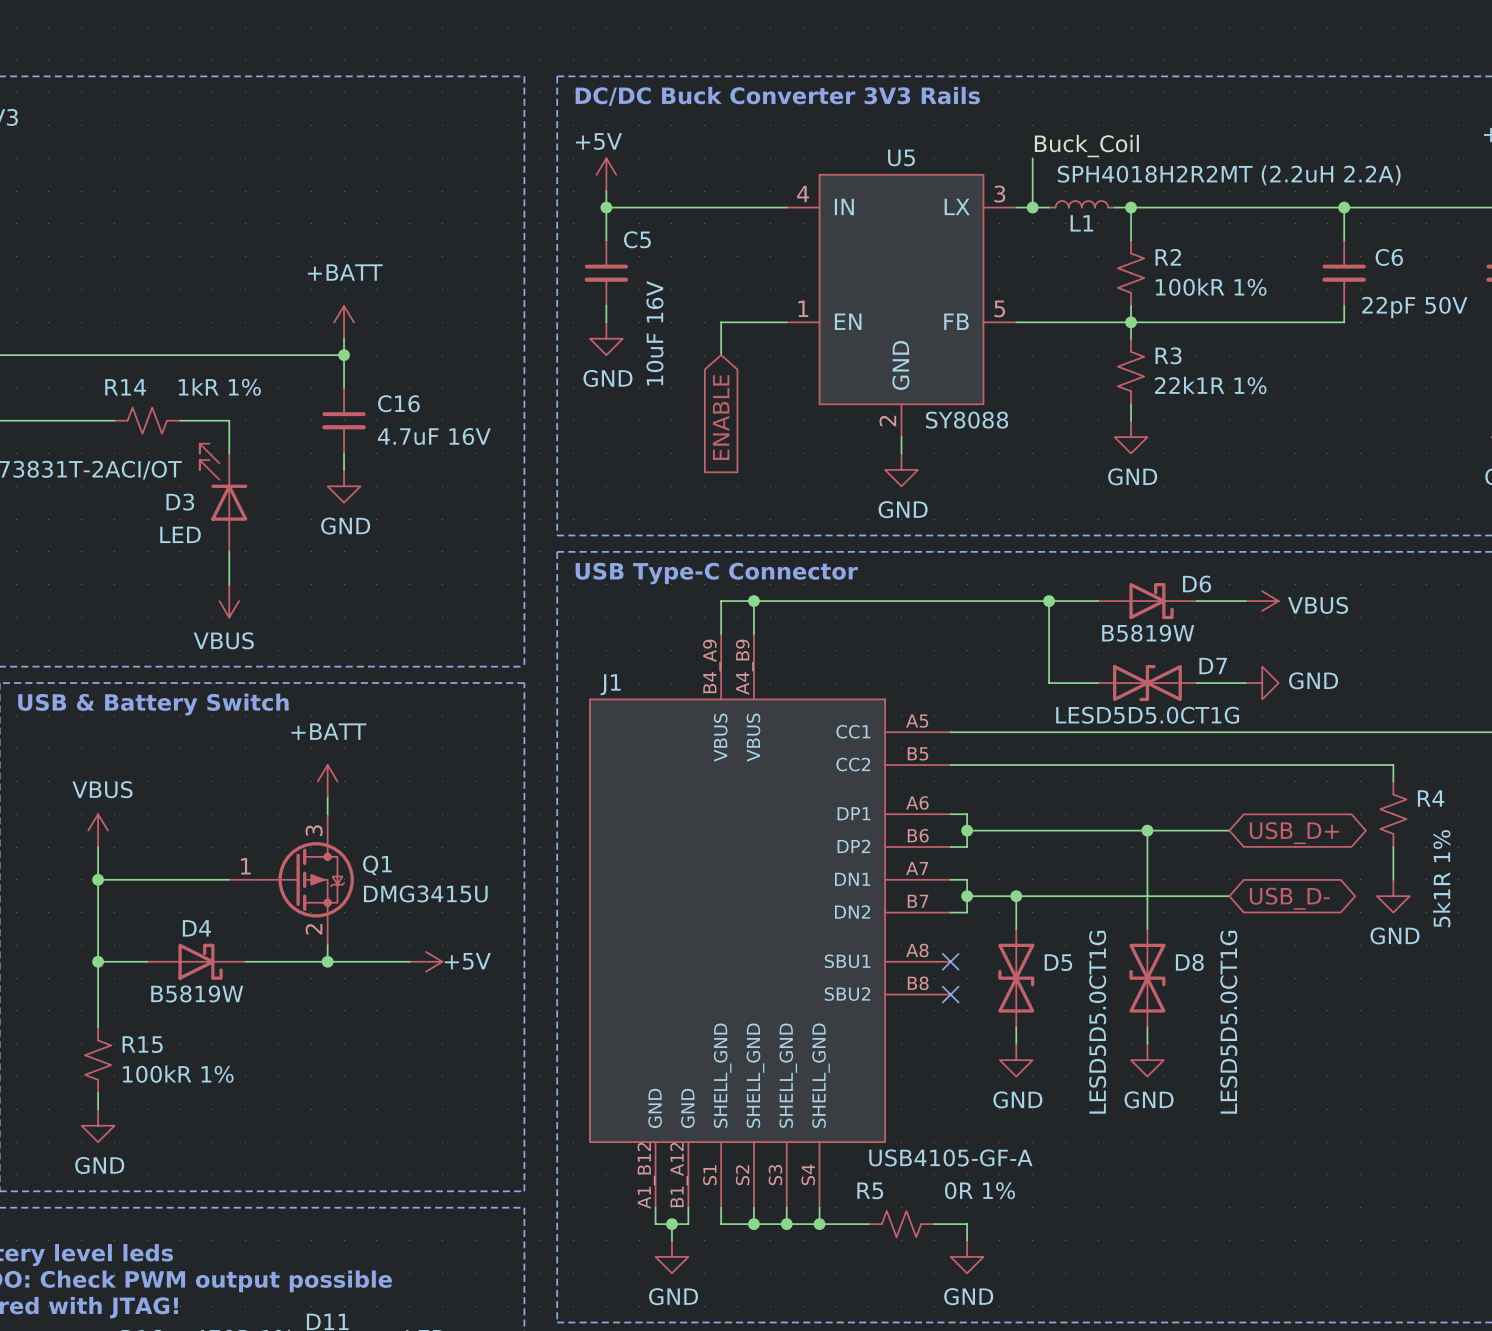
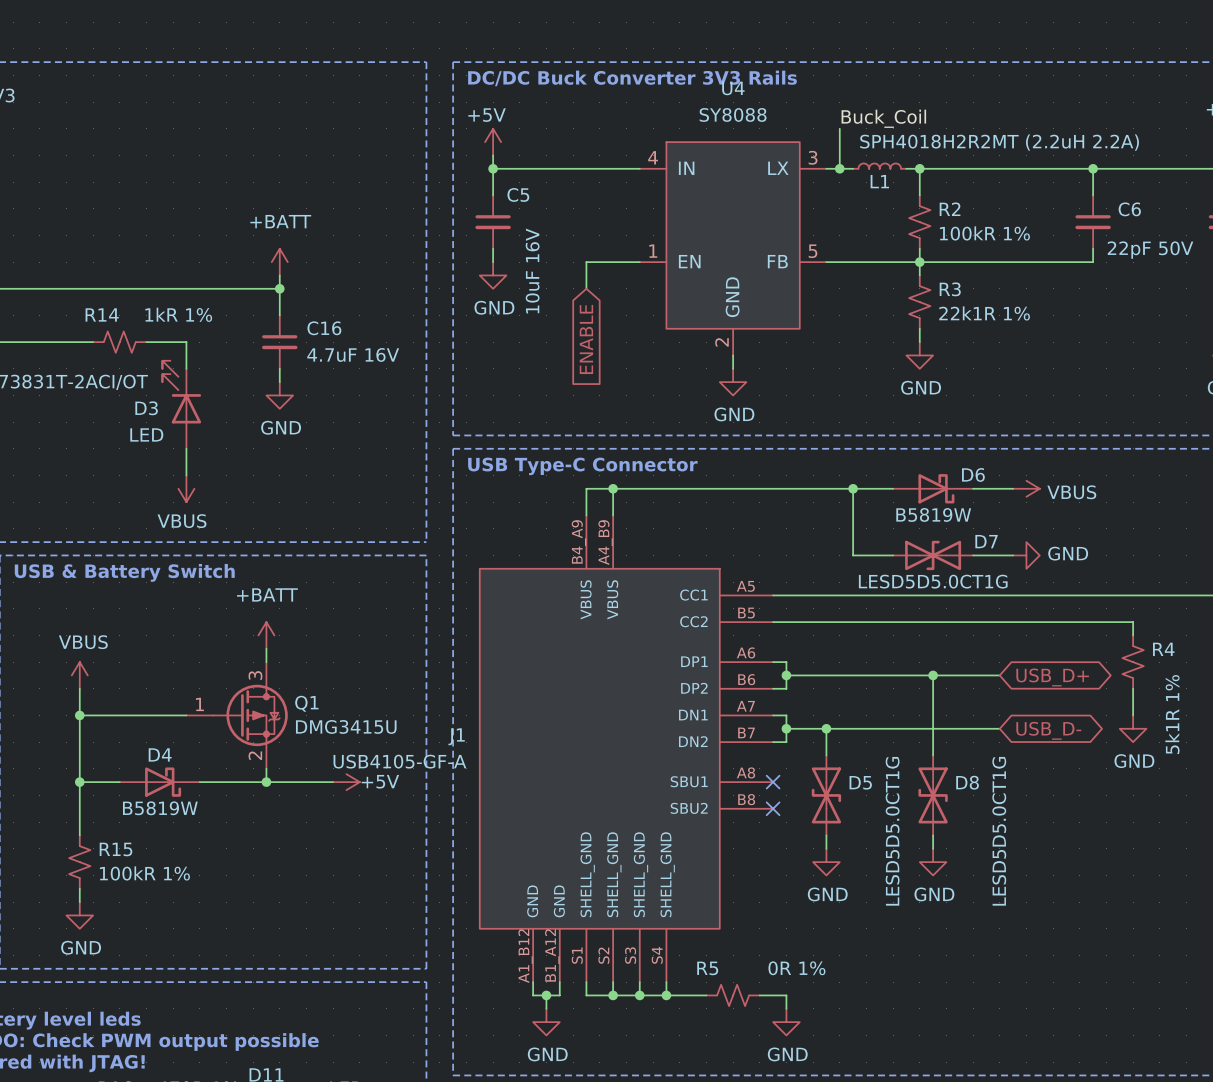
U5 name: U5 (901, 157) -> U4 (733, 88)
U5 value position: SY8088 (967, 420) -> SY8088 (733, 114)
J1 name position: J1 (610, 684) -> J1 (456, 736)
J1 value position: USB4105-GF-A (950, 1157) -> USB4105-GF-A (399, 761)

